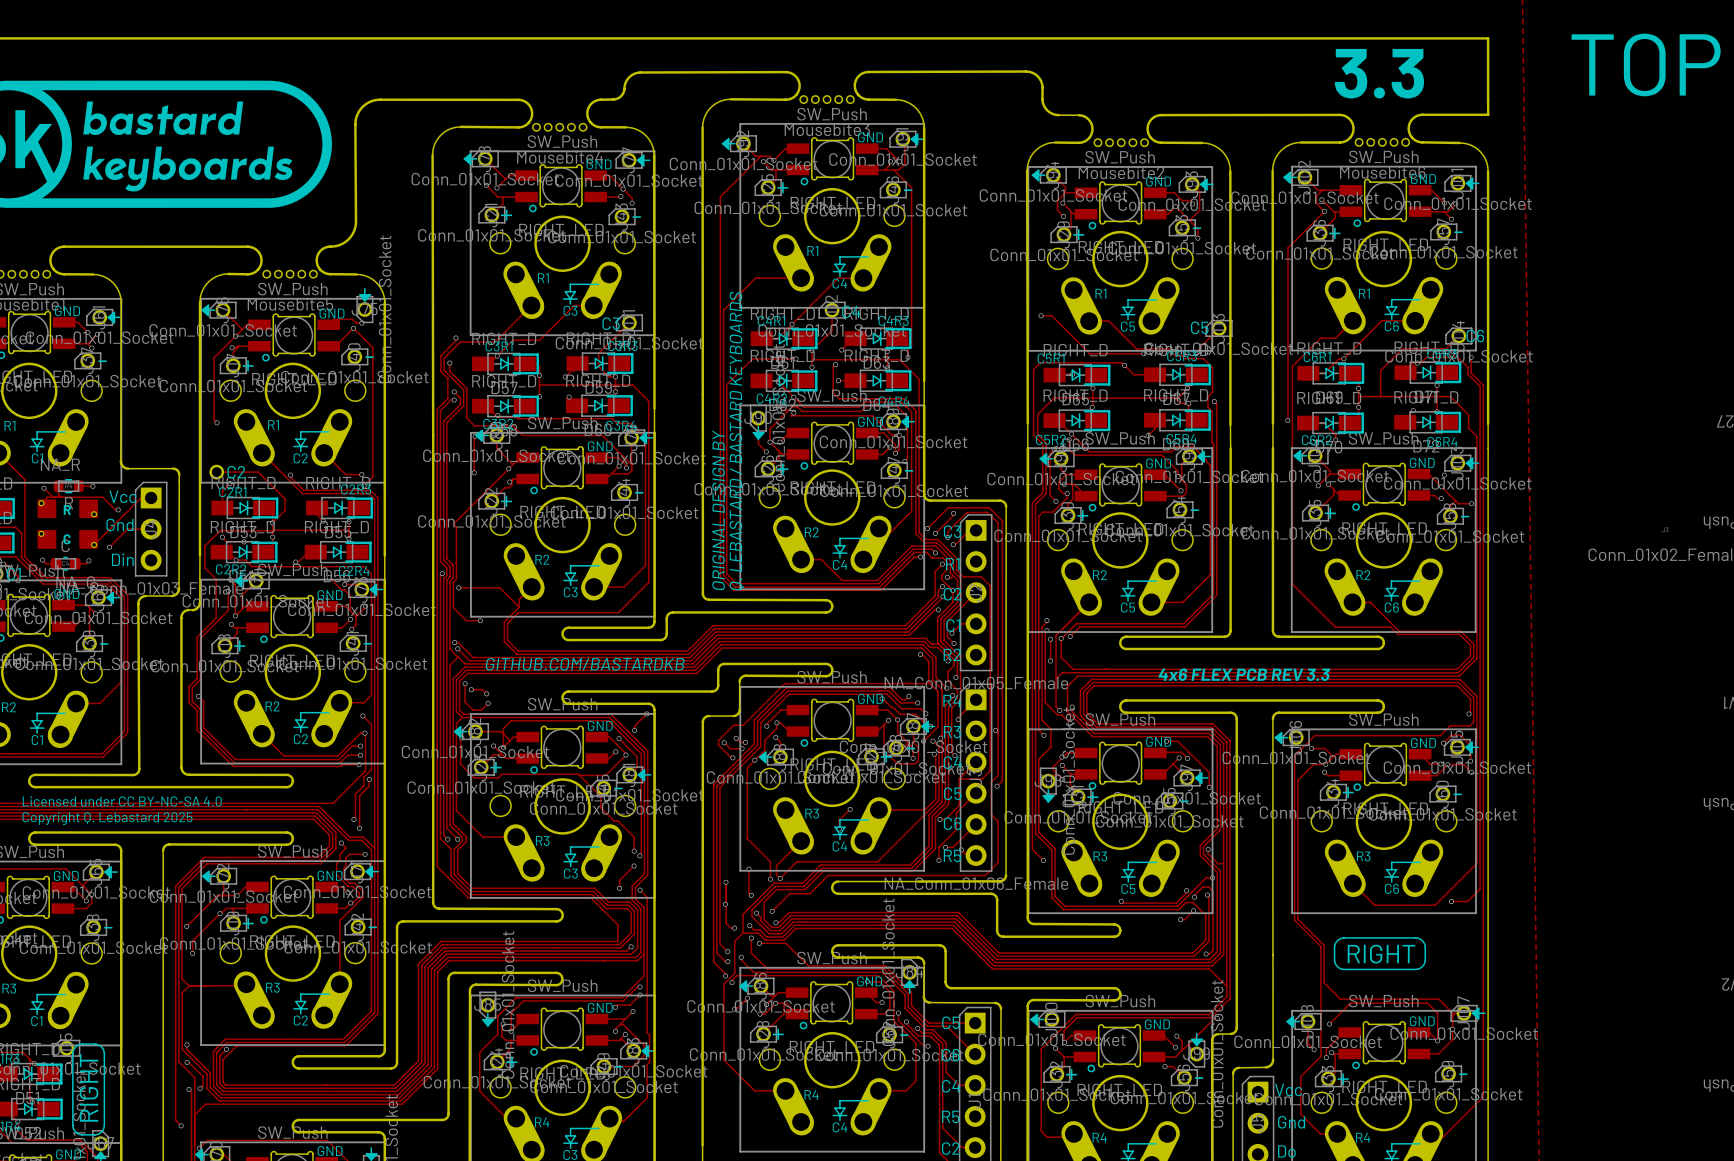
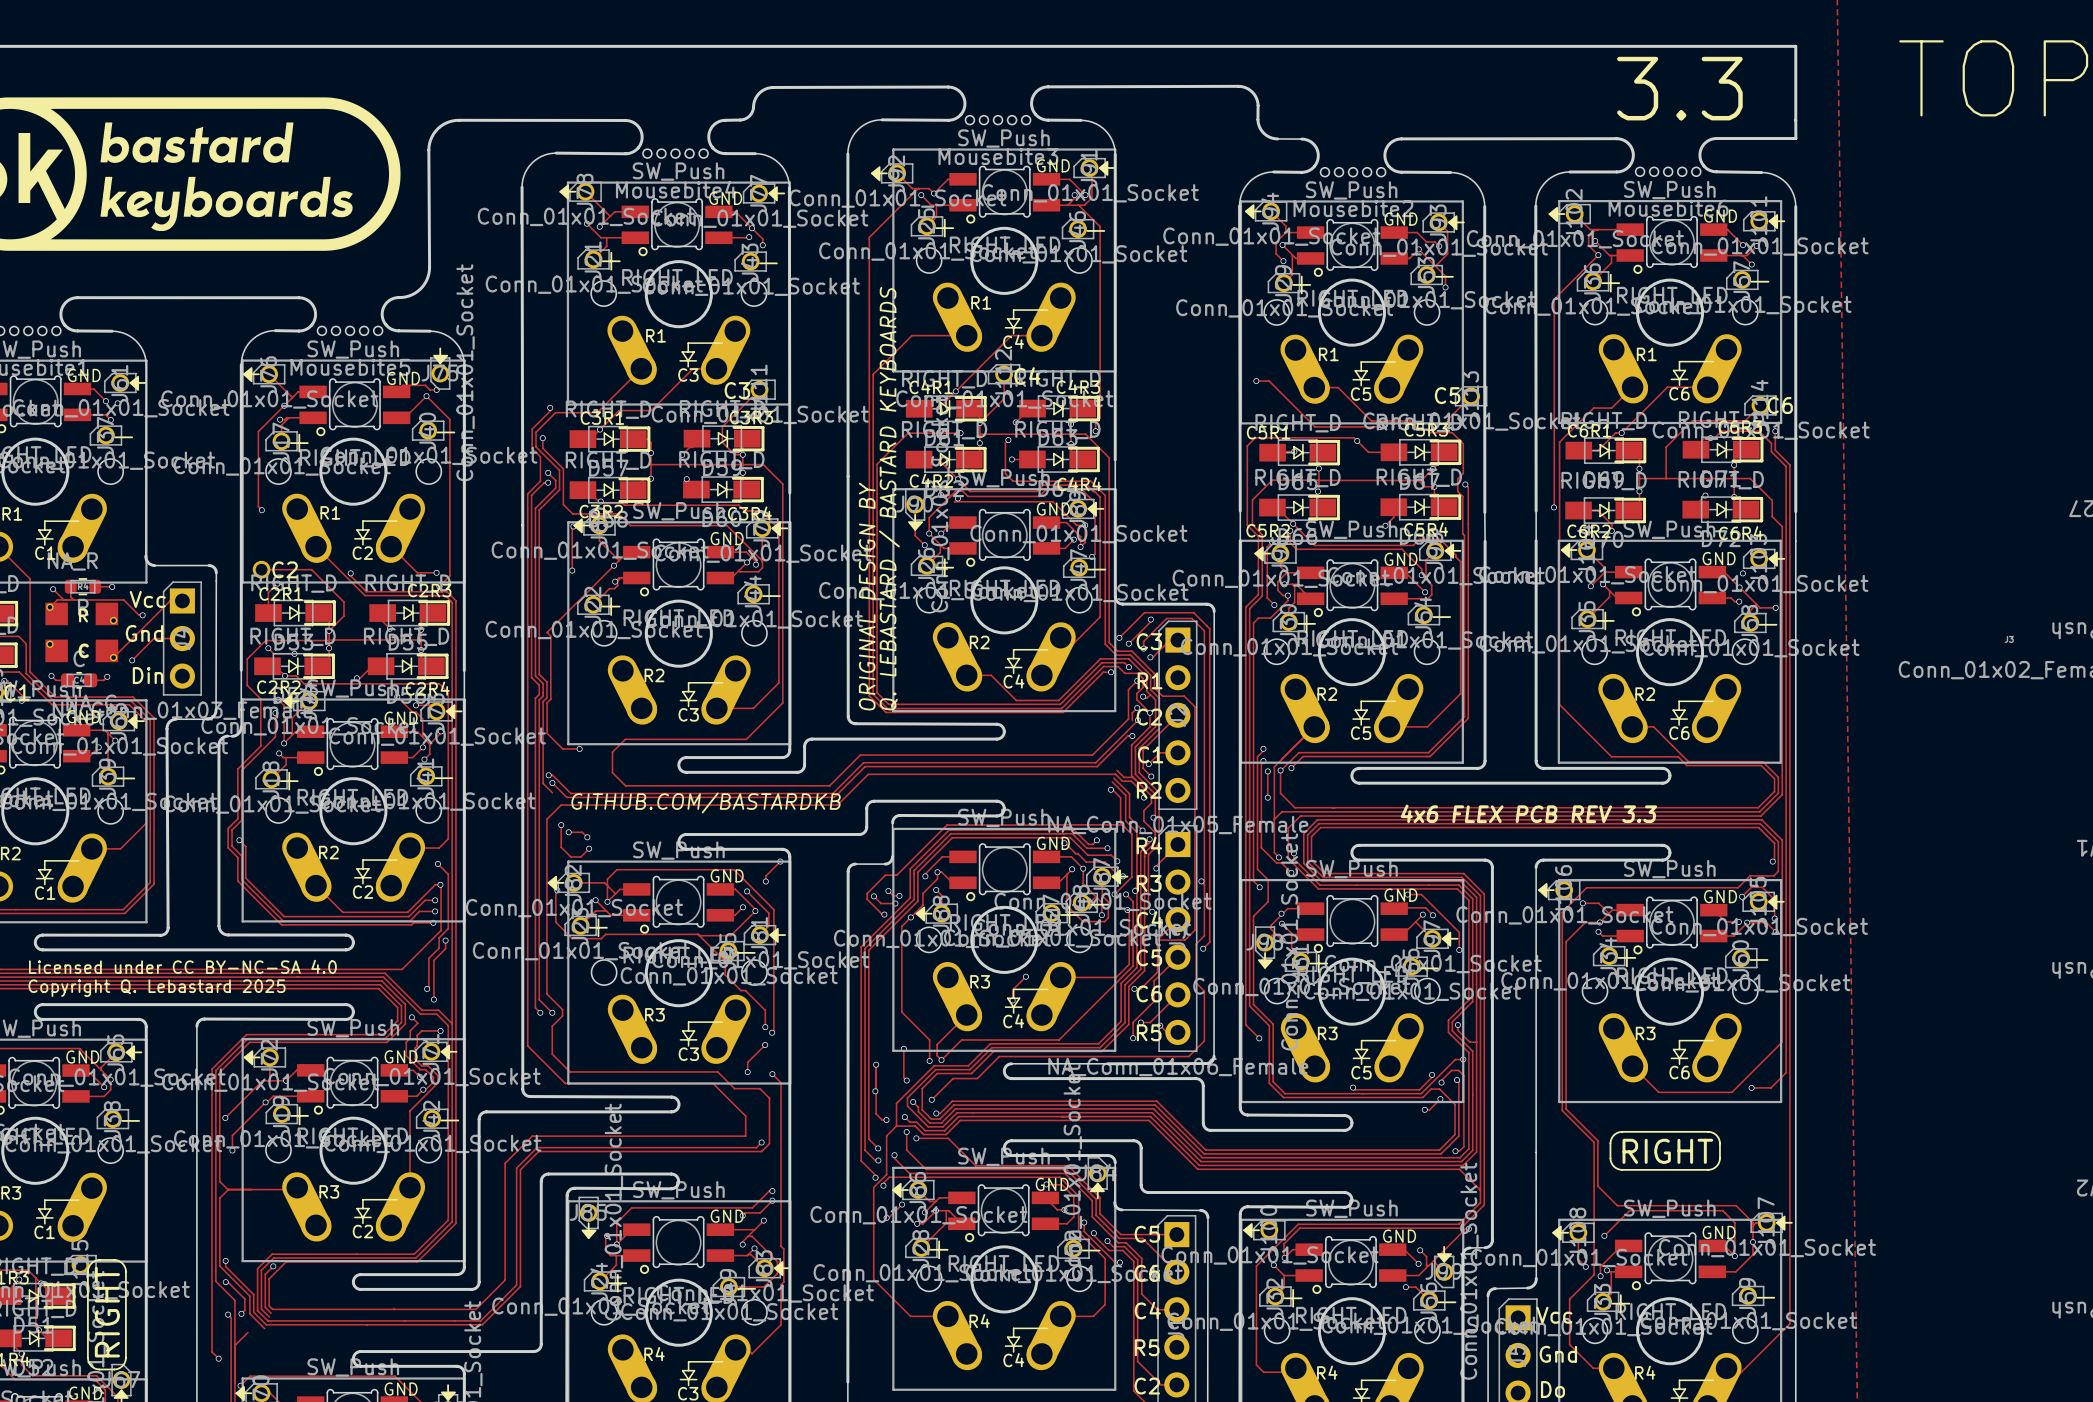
track: (442, 573) (440, 575) (440, 838) (451, 849) (451, 875) (469, 894) (592, 894) (606, 908) (627, 908) (631, 912) (631, 932) (619, 944) (442, 944) (421, 965) (421, 1062) (395, 1088) (224, 1088) -> none
via: (442, 573) -> none
track: (458, 587) (499, 587) (519, 607) -> none
via: (458, 587) -> none
track: (531, 587) (519, 599) (519, 607) -> none
track: (938, 597) (906, 628) (714, 628) (688, 654) (517, 654) (504, 641) (504, 622) (519, 607) -> none
track: (925, 638) (718, 638) (692, 663) (465, 663) (458, 656) (450, 665) (450, 825) (462, 837) (462, 841) (454, 849) (454, 874) (471, 891) (593, 891) (607, 905) (628, 905) (634, 911) (634, 934) (620, 947) (443, 947) (424, 966) (424, 1063) (397, 1091) (223, 1091) -> none
track: (923, 644) (720, 644) (695, 670) (466, 670) (456, 680) (456, 711) (462, 717) -> none
track: (921, 648) (722, 648) (696, 673) (467, 673) (459, 681) (459, 710) (463, 714) (610, 714) (647, 751) (647, 875) (635, 887) (635, 898) (644, 907) (644, 975) (622, 997) (516, 997) (497, 1016) (497, 1034) (479, 1052) (479, 1091) (506, 1118) (516, 1118) -> none
track: (462, 717) (609, 717) (644, 752) (644, 873) (632, 886) (632, 900) (640, 908) (640, 952) (636, 957) (447, 957) (434, 970) (434, 1067) (401, 1100) (219, 1100) -> none
track: (462, 717) (456, 723) (456, 810) (482, 837) (516, 837) -> none
track: (644, 954) (637, 960) (449, 960) (437, 971) (437, 1068) (402, 1104) (205, 1104) -> none

